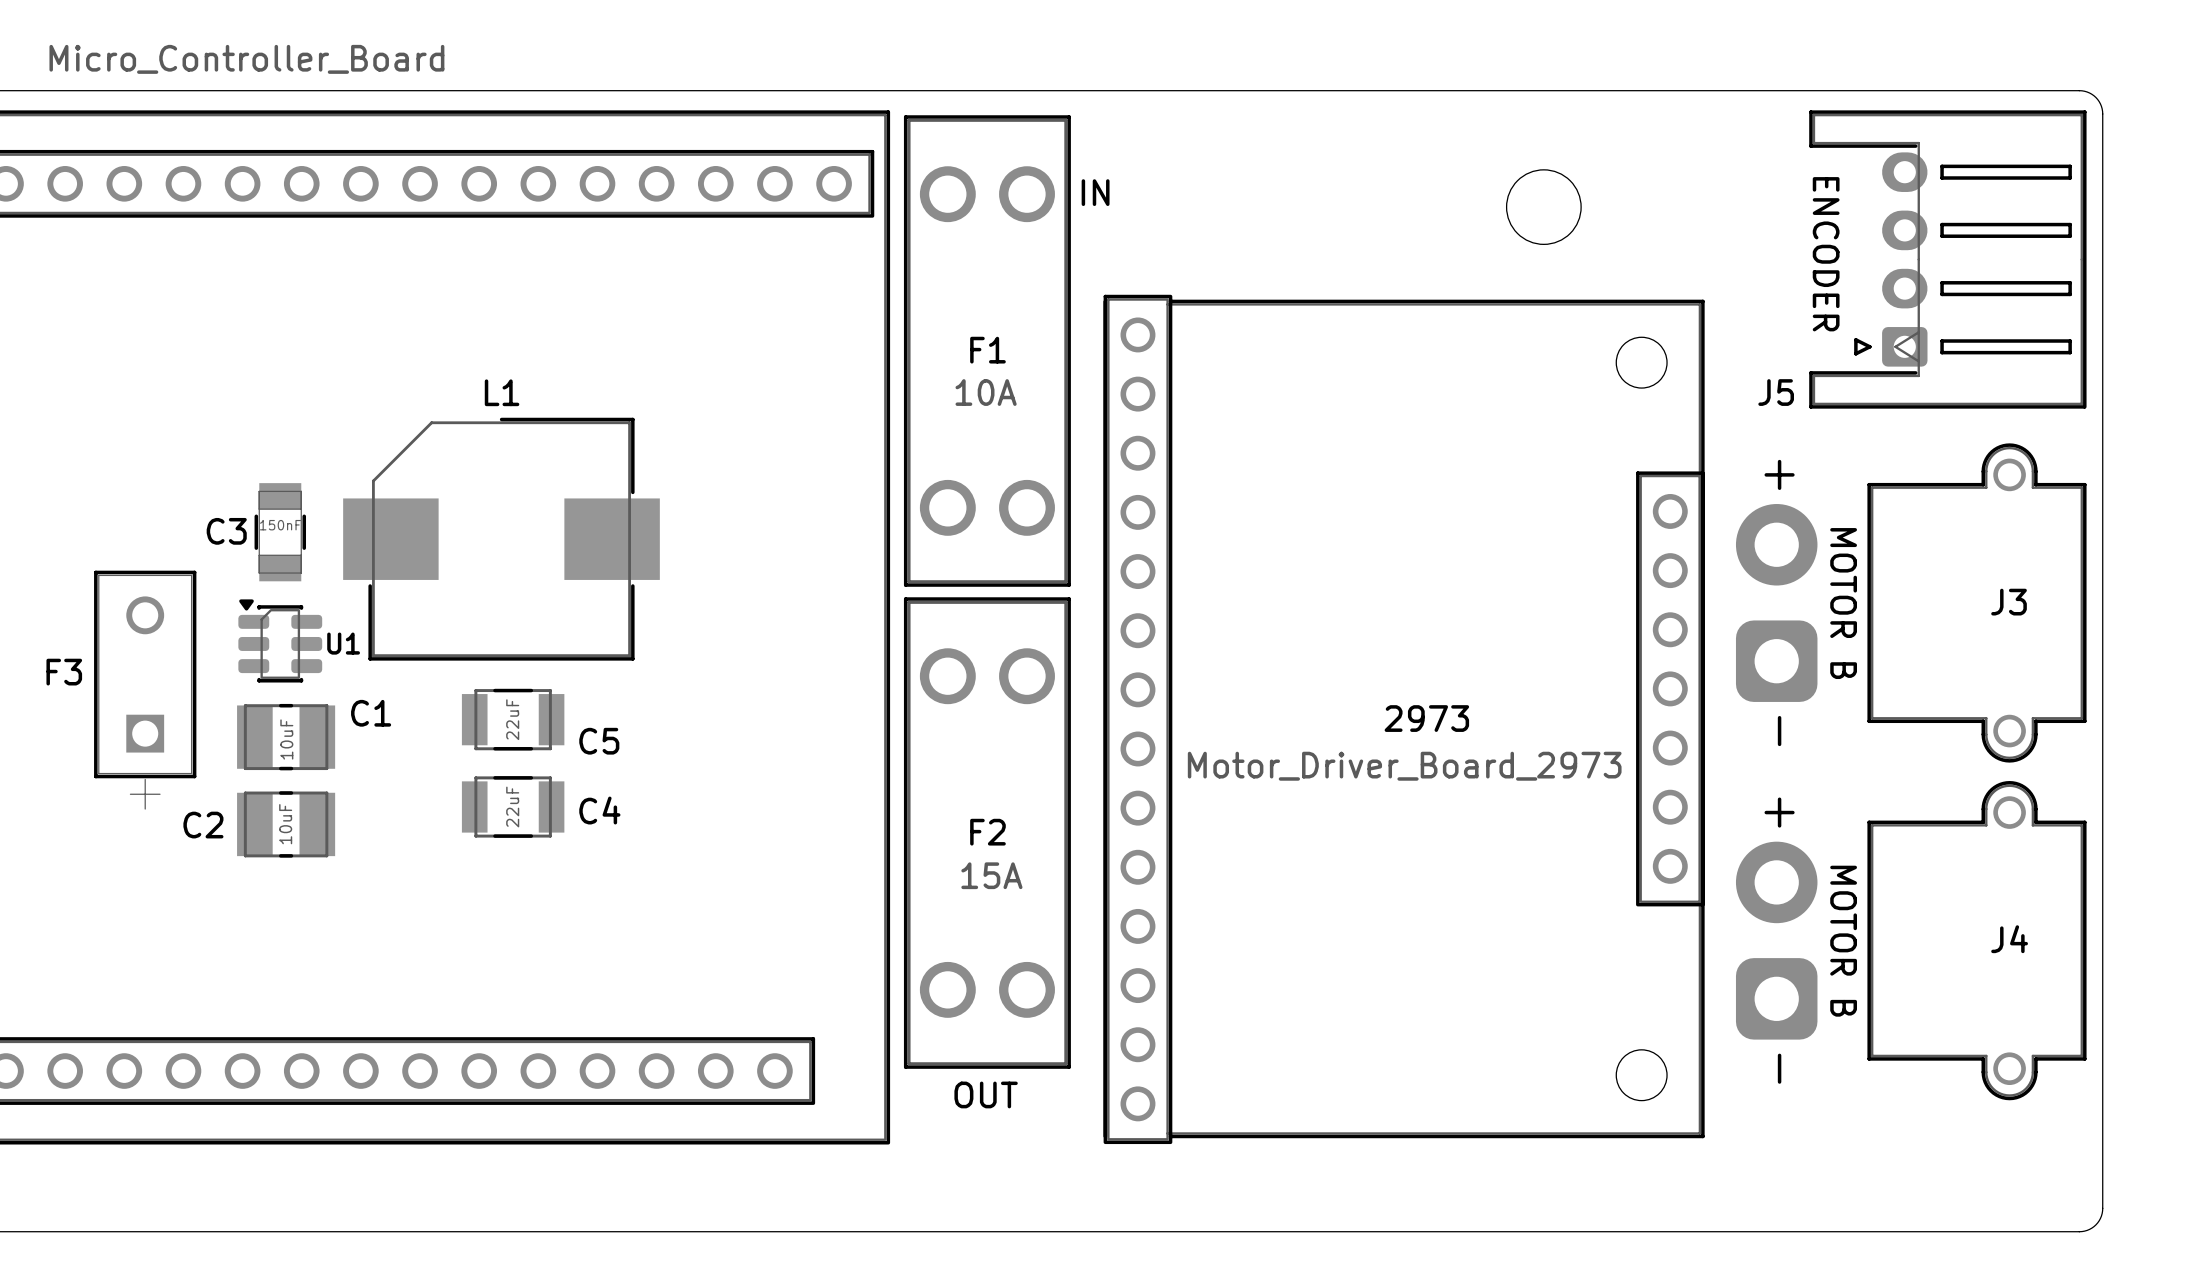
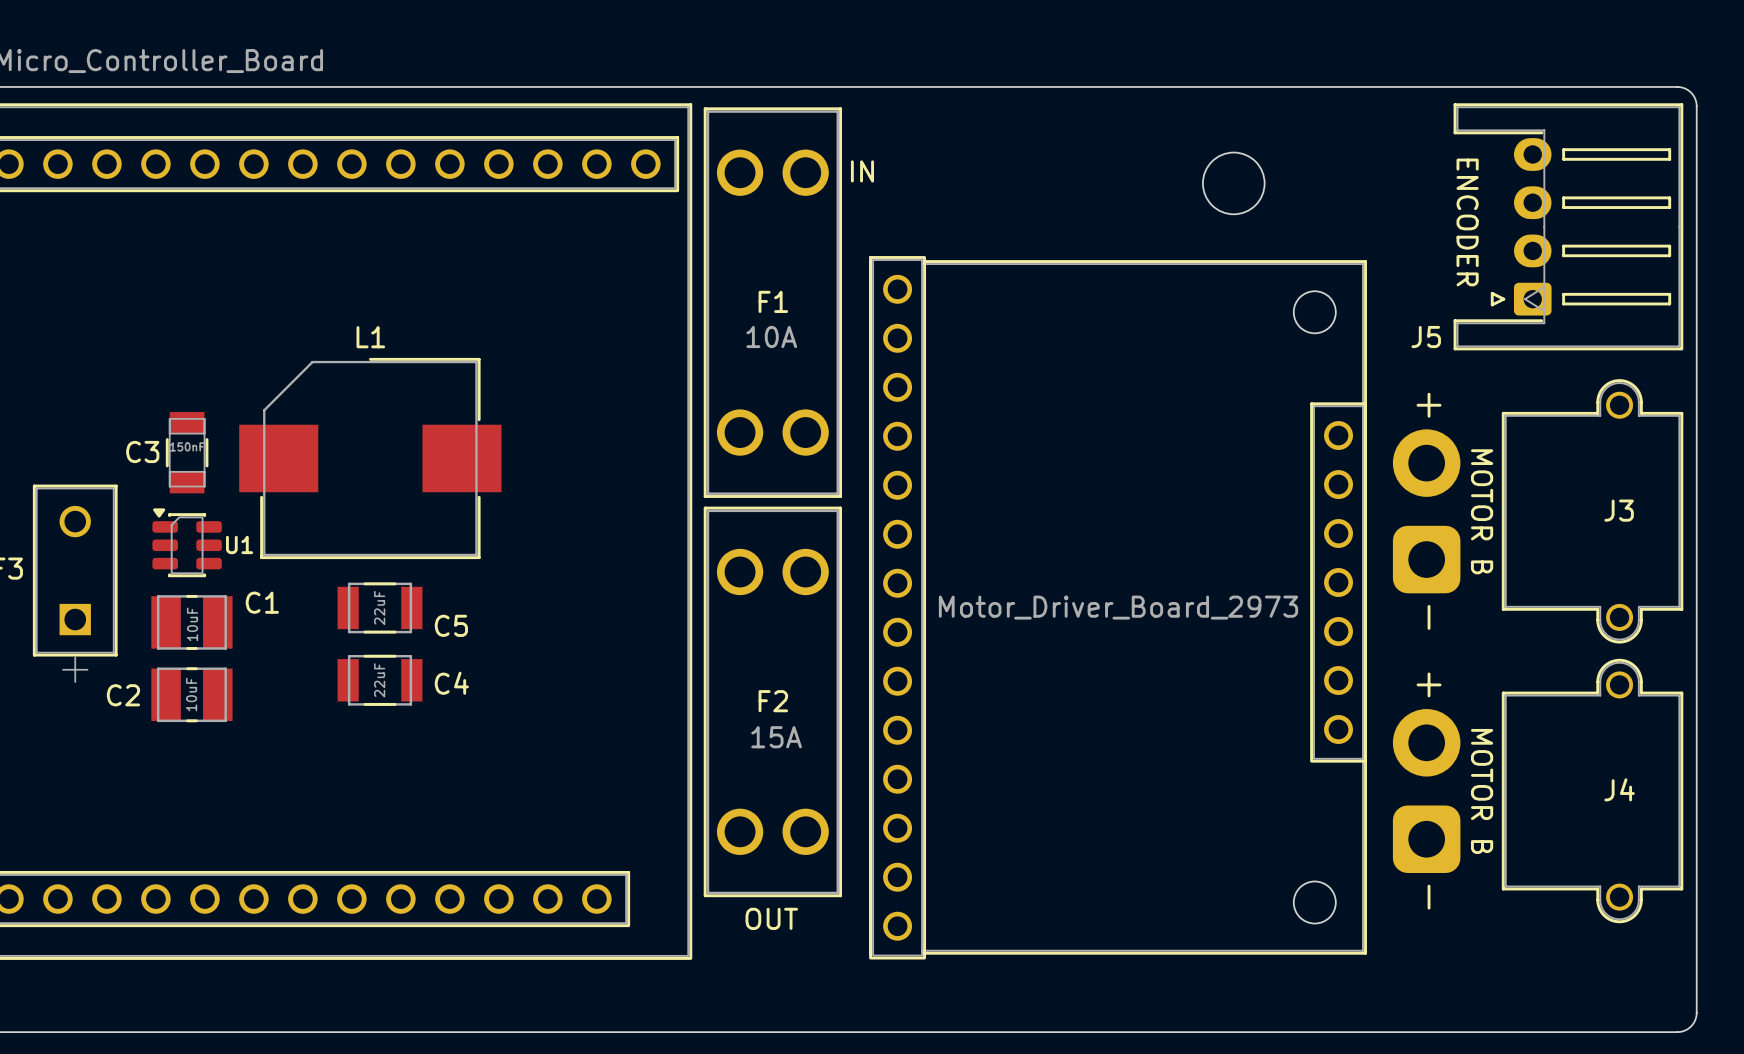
text: 2973 (1426, 718) -> none
part value position: Motor_Driver_Board_2973 (1404, 766) -> Motor_Driver_Board_2973 (1118, 607)

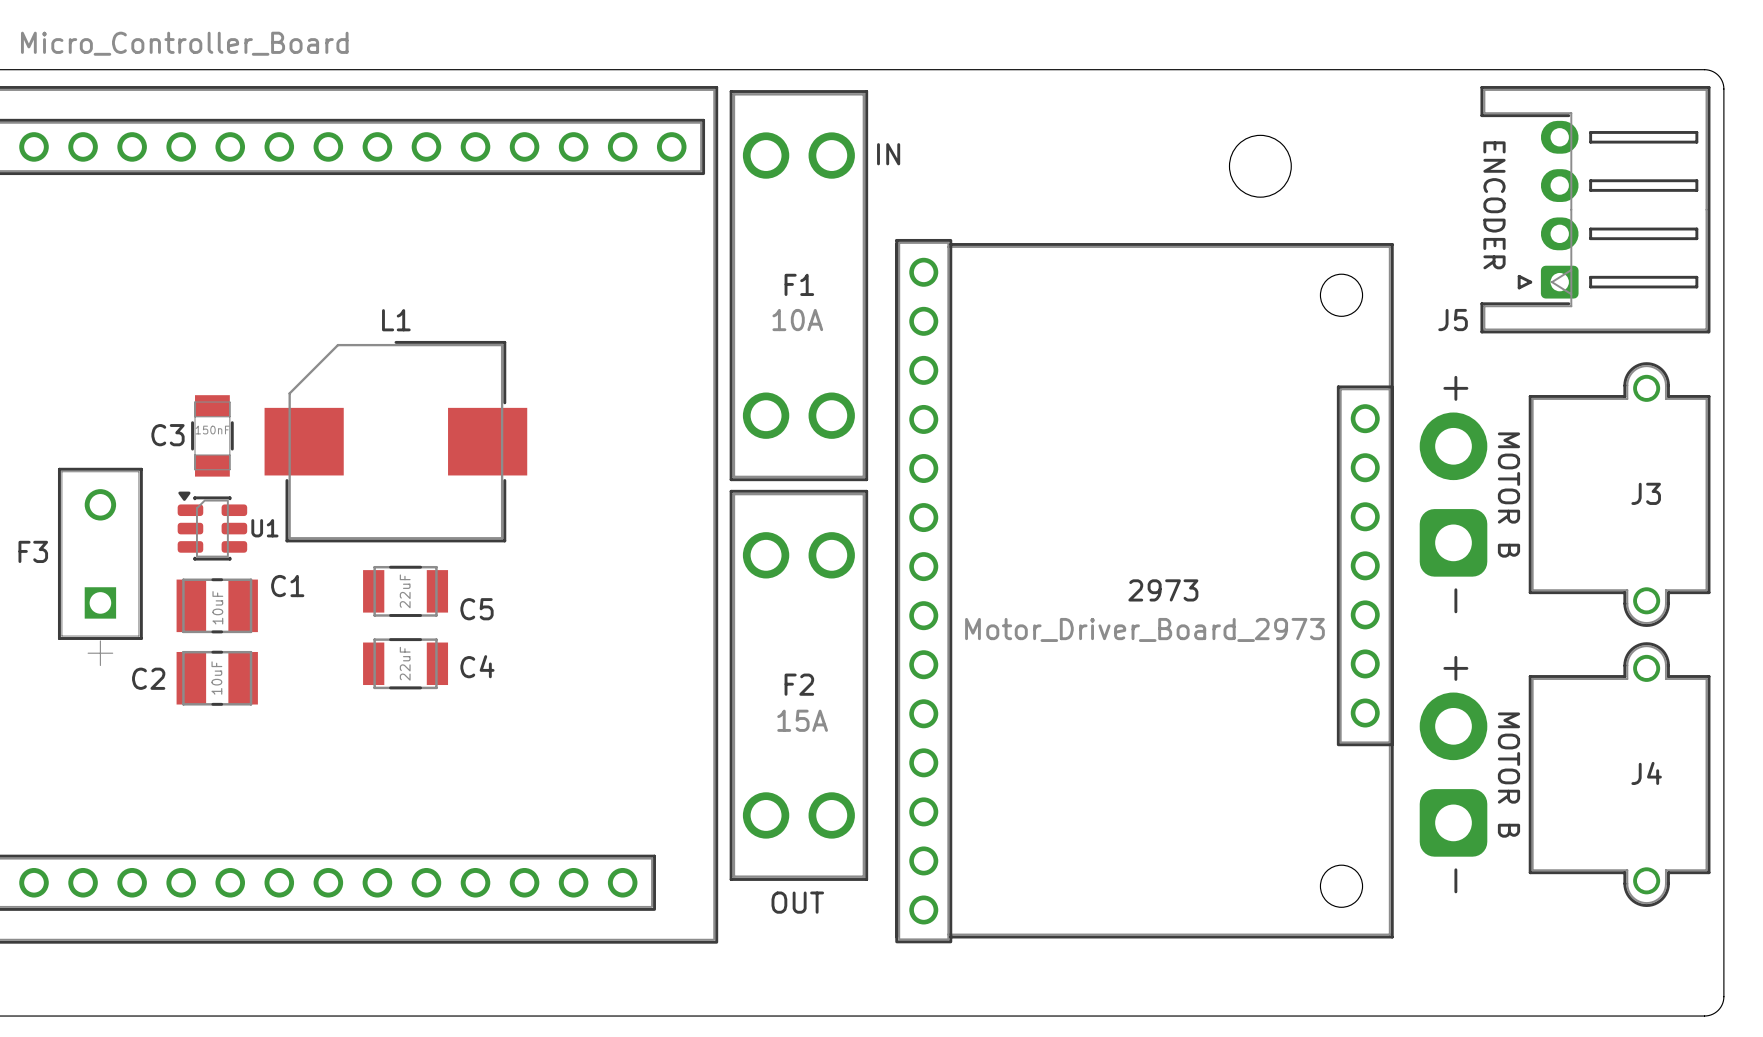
part value position: Motor_Driver_Board_2973 (1118, 607) -> Motor_Driver_Board_2973 (1144, 629)
text: none -> 2973 (1163, 590)

